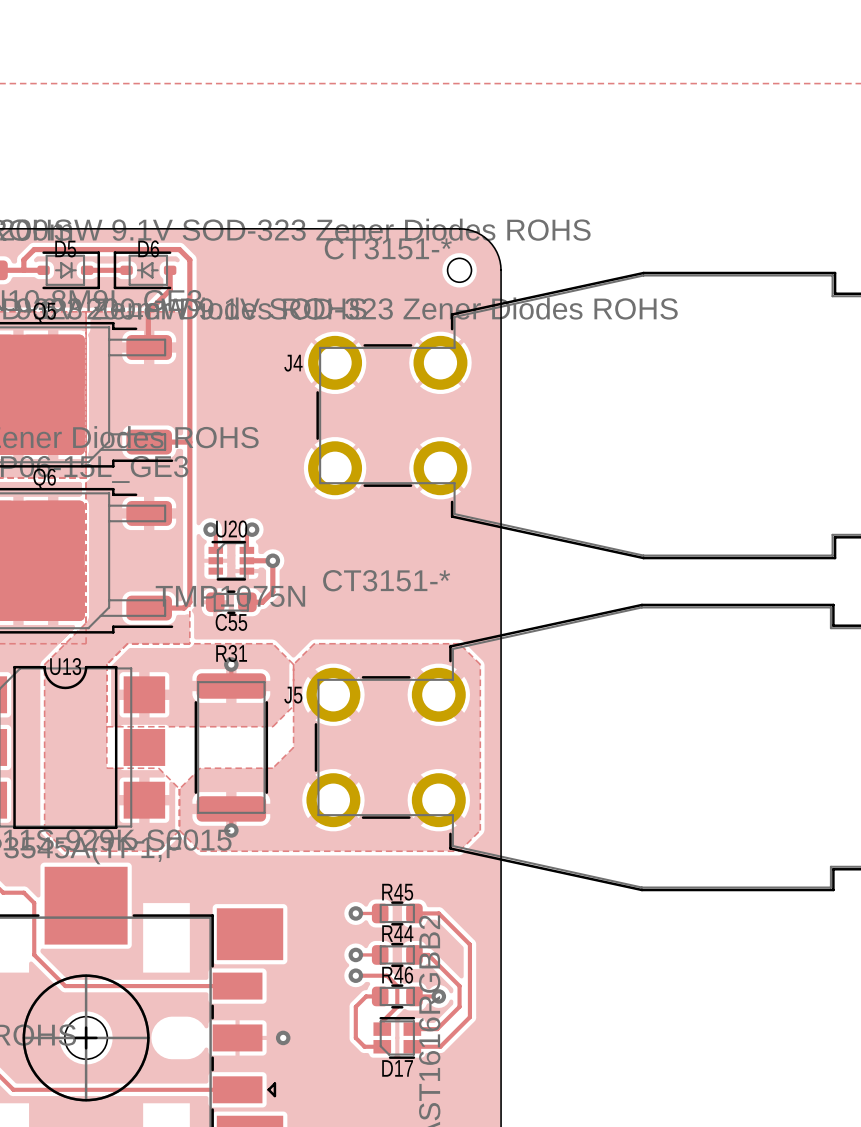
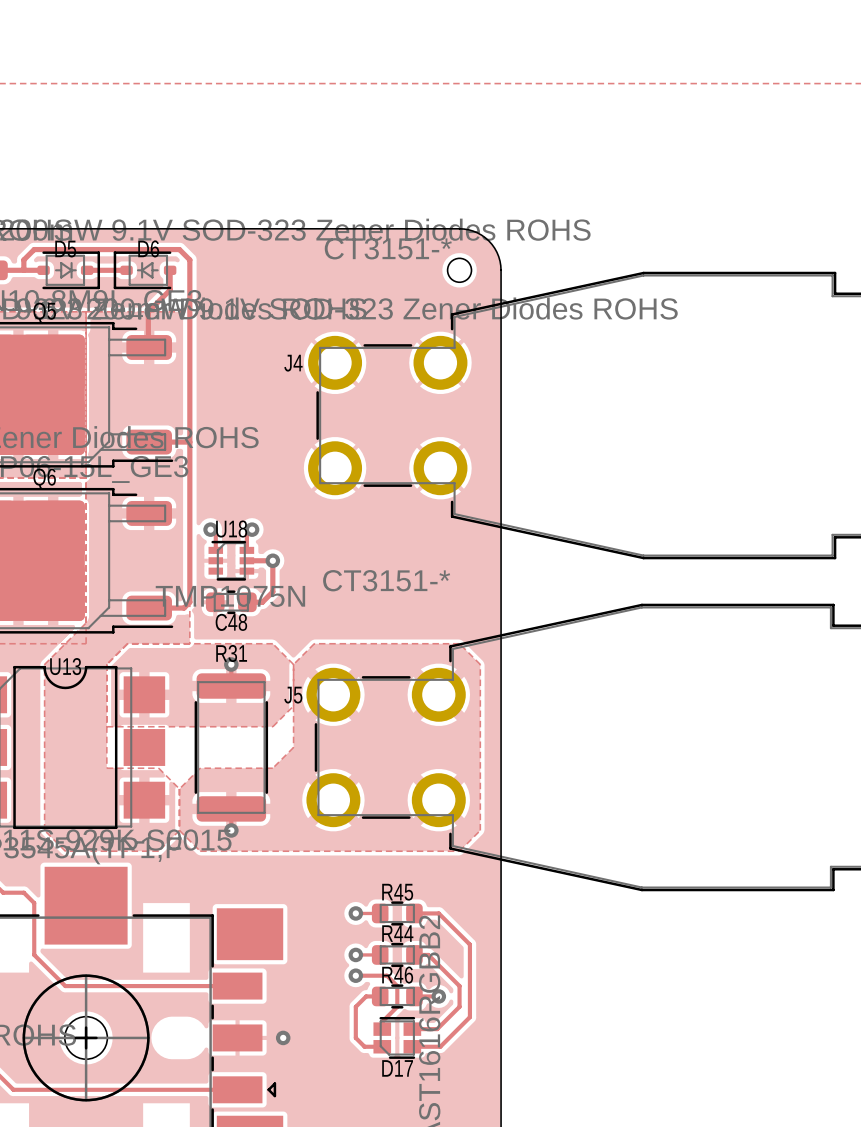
U20 name: U20 (231, 529) -> U18 (231, 529)
C55 name: C55 (231, 622) -> C48 (231, 622)

